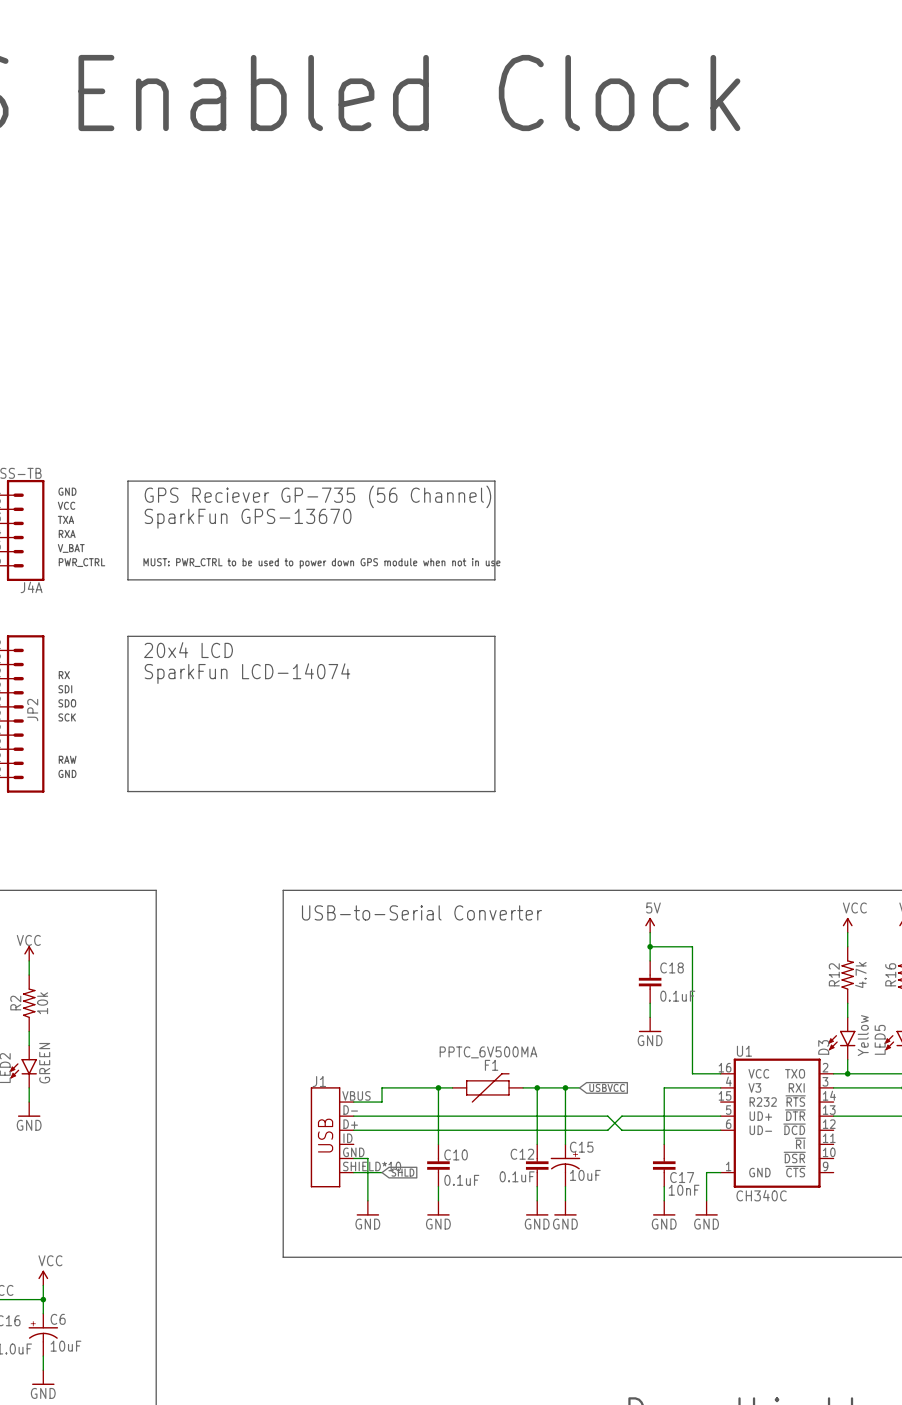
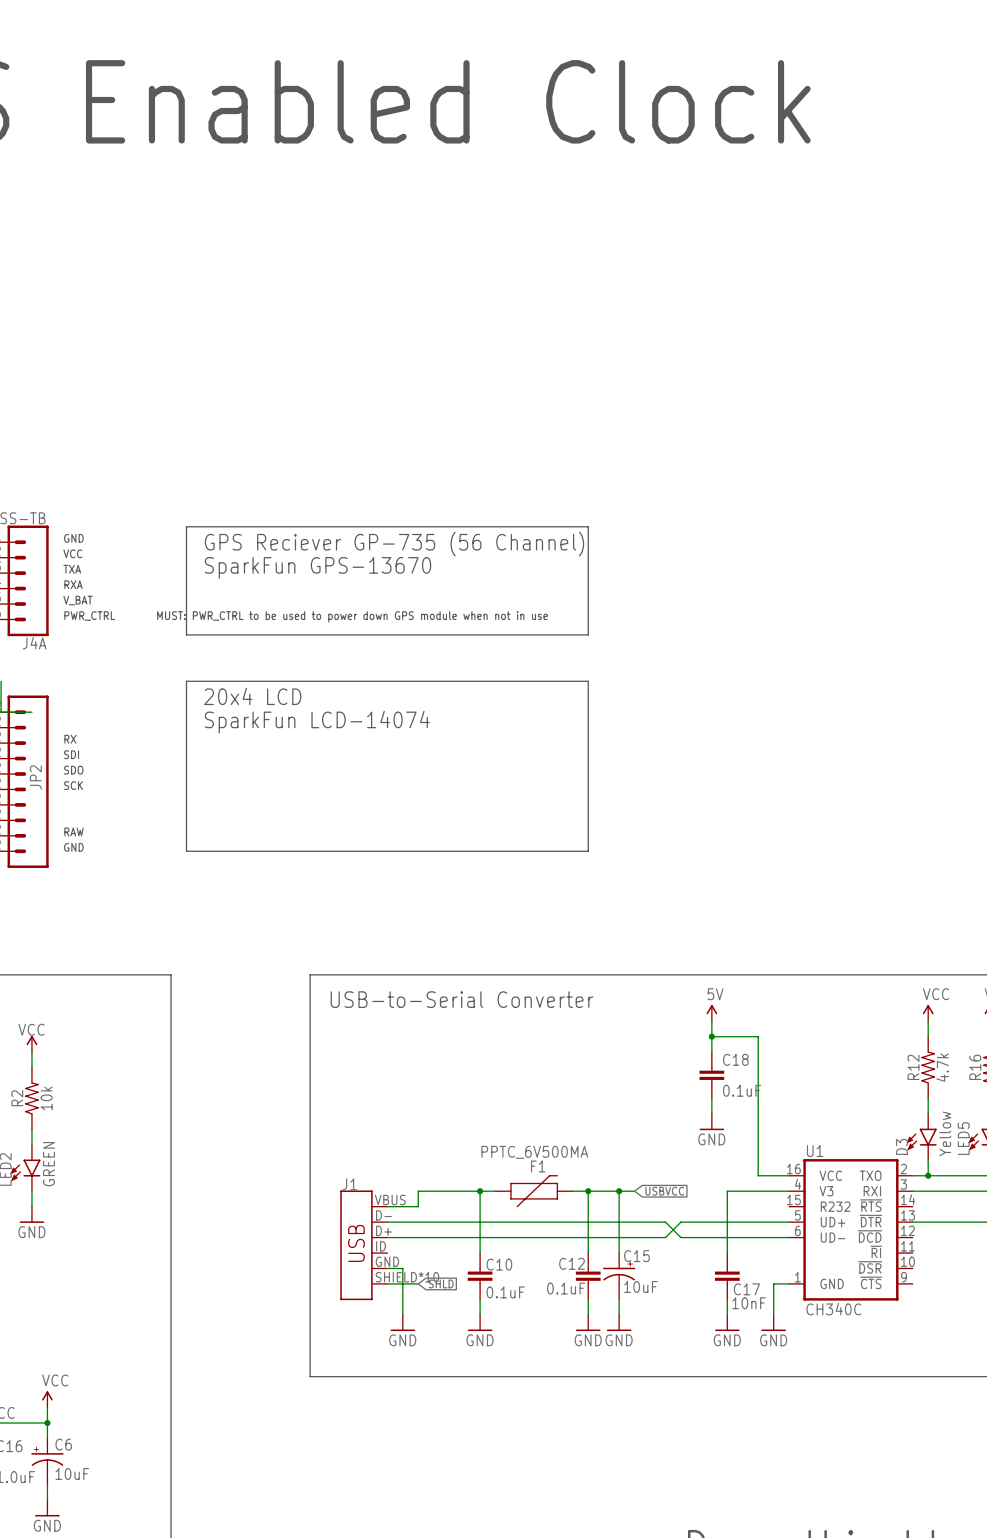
line: (170, 481) (127, 481) (127, 579) (170, 579) -> (186, 526) (186, 634)
line: (494, 481) (494, 579) -> (541, 526) (588, 526) (588, 634) (541, 634)
text position: GPS Reciever GP-735 (56 Channel) (317, 496) -> GPS Reciever GP-735 (56 Channel) (394, 544)
text position: SparkFun GPS-13670 (248, 518) -> SparkFun GPS-13670 (317, 567)
wire: none -> (1, 681) (1, 712) (31, 712)
line: (127, 636) (127, 791) (494, 791) (494, 636) (127, 636) -> (186, 681) (186, 851) (588, 851) (588, 681) (186, 681)
text position: 20x4 LCD (188, 650) -> 20x4 LCD (252, 696)
text position: SparkFun LCD-14074 (247, 673) -> SparkFun LCD-14074 (317, 722)

